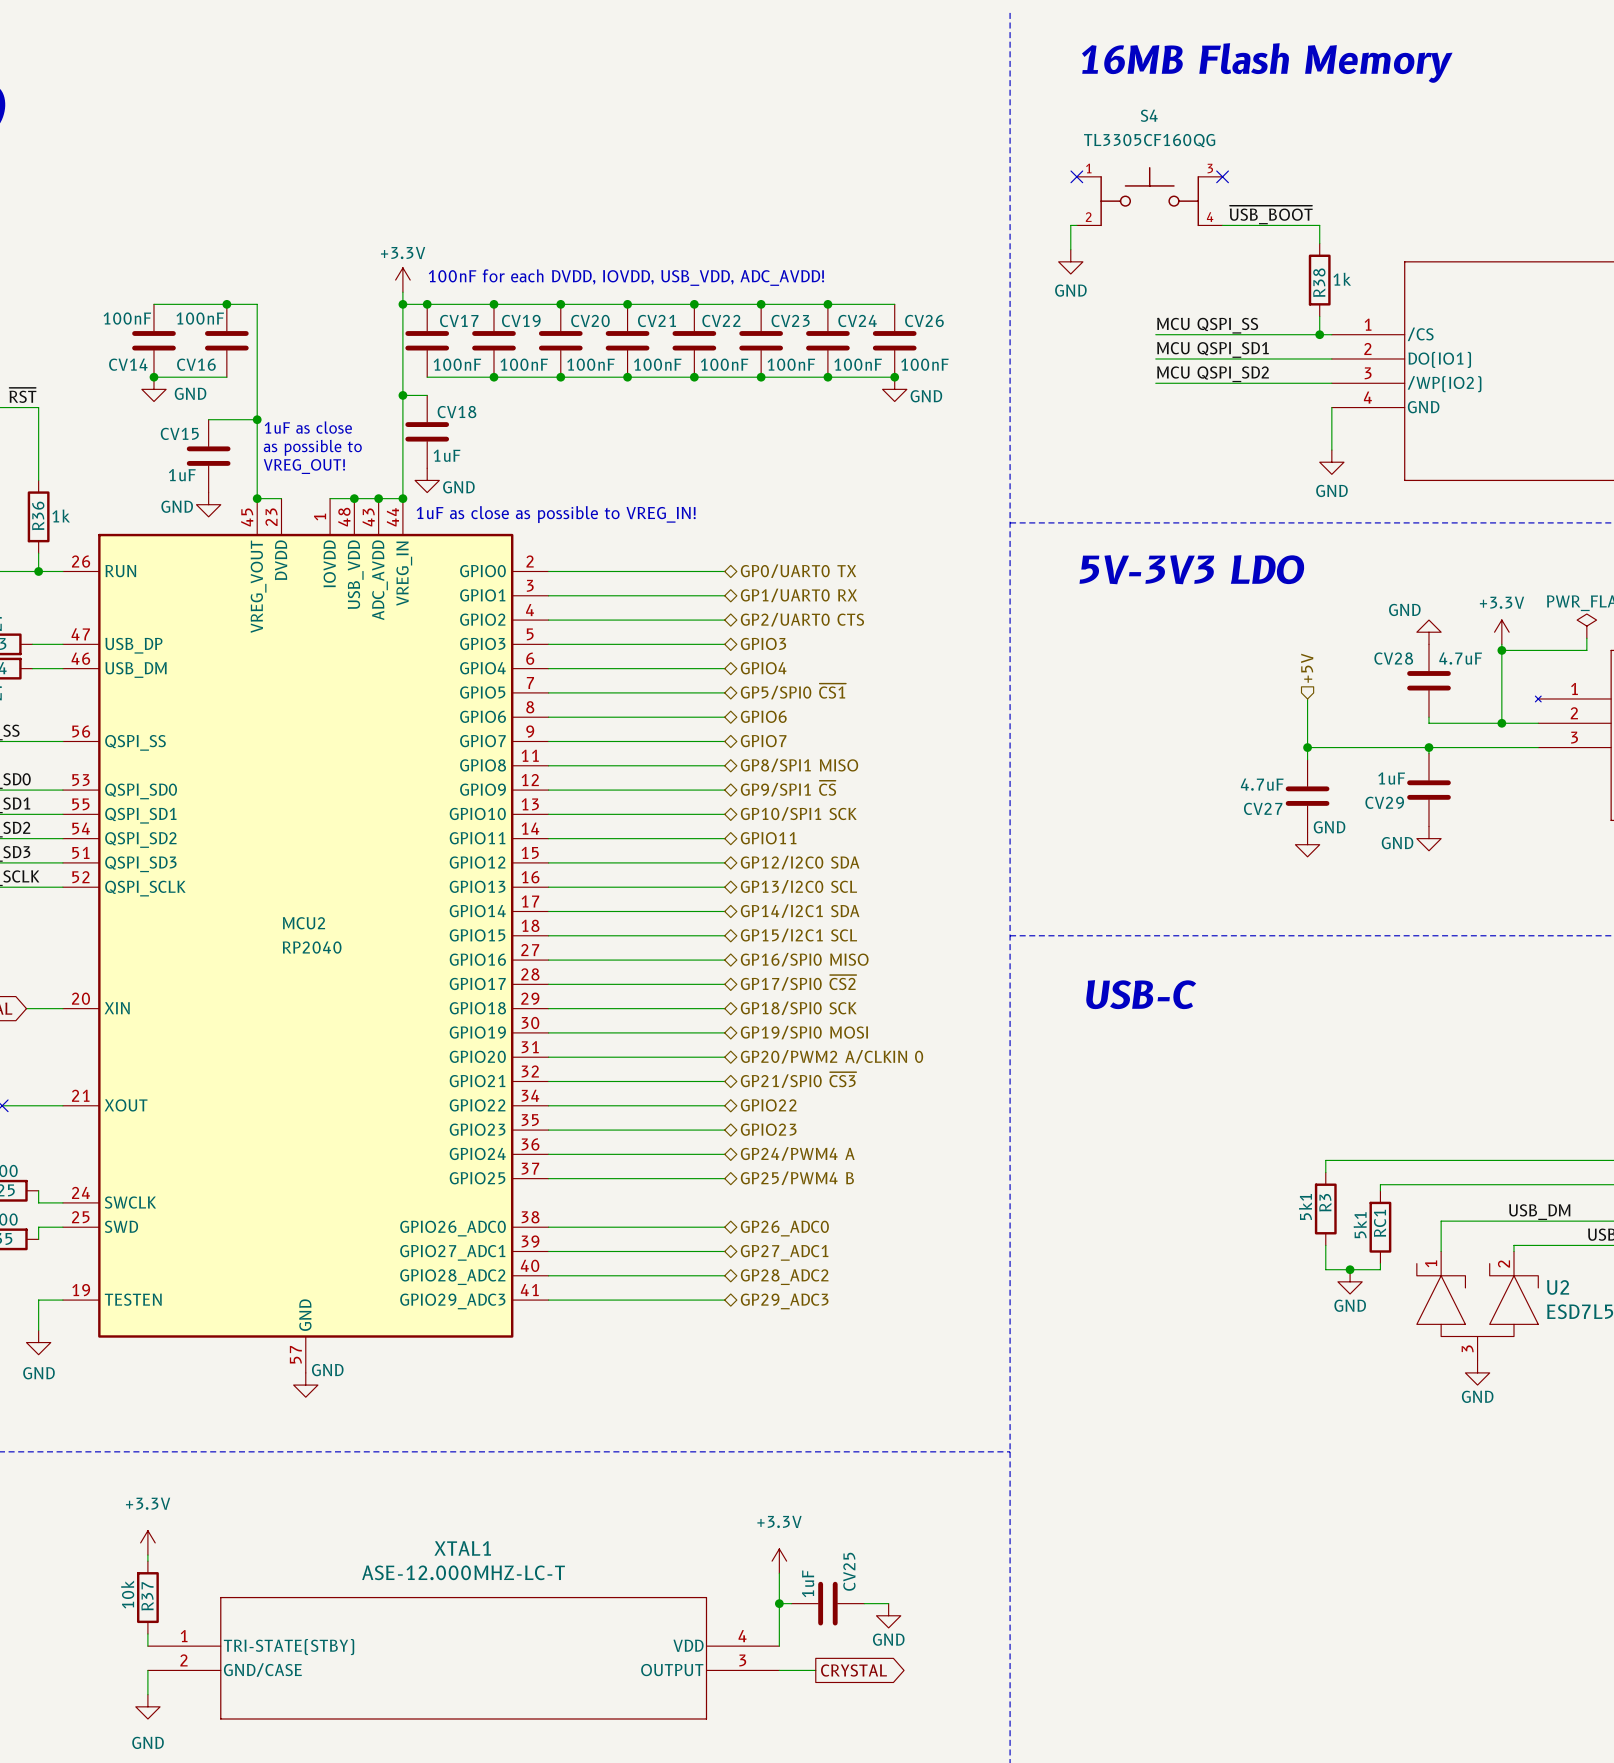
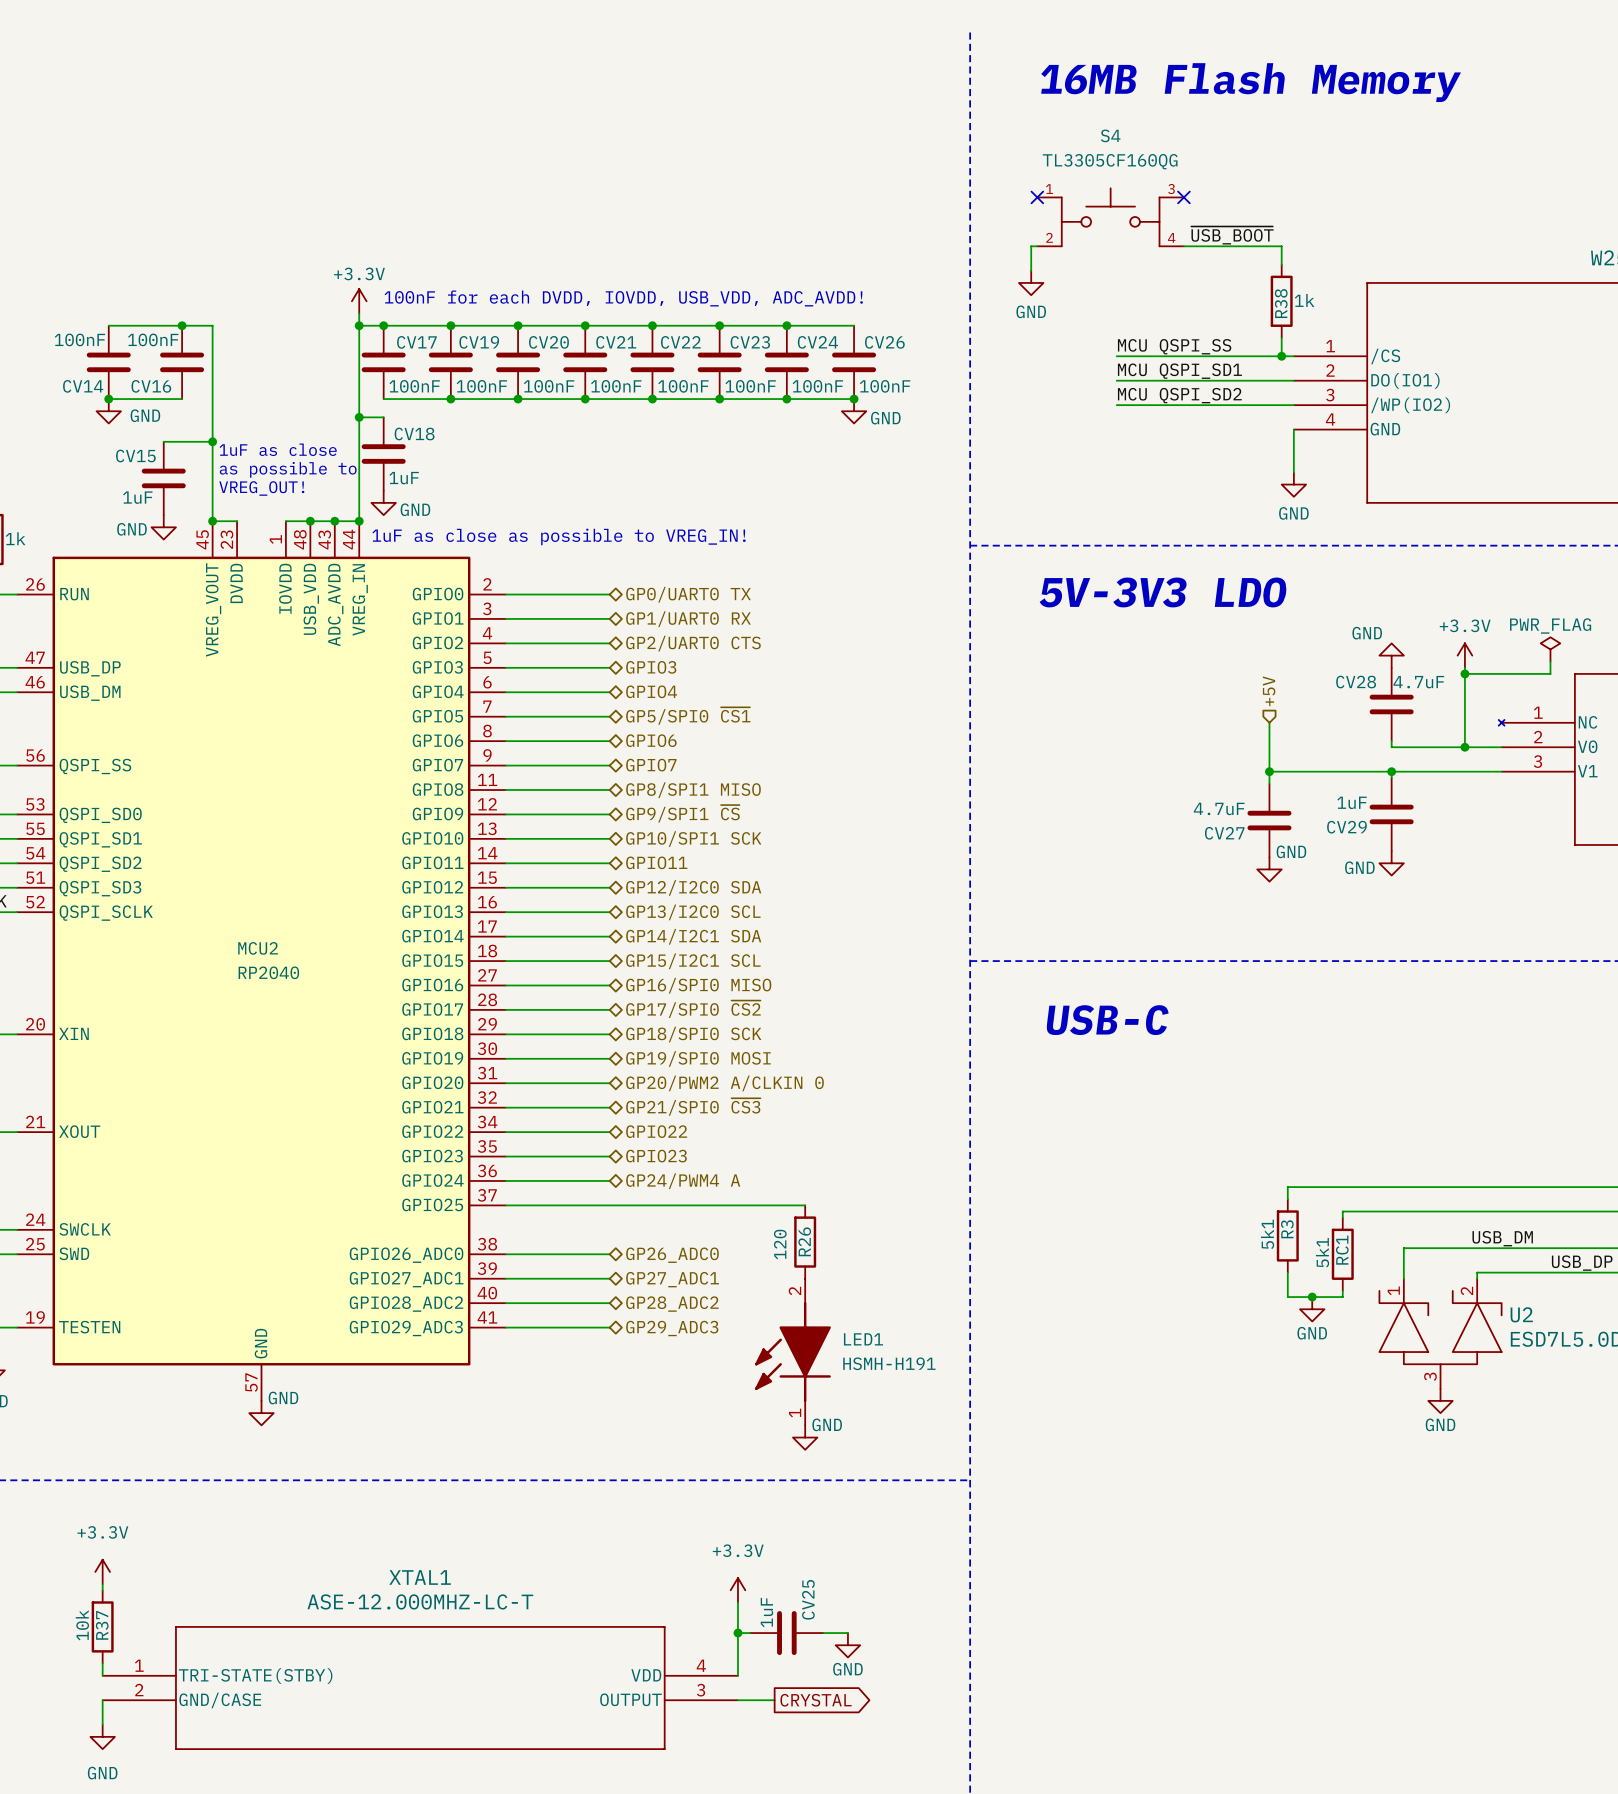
wire: (651, 571) (724, 571) -> none
hierarchical label position: GP0/UART0 TX (798, 571) -> GP0/UART0 TX (688, 594)
wire: (651, 595) (724, 595) -> none
hierarchical label position: GP1/UART0 RX (798, 595) -> GP1/UART0 RX (688, 619)
hierarchical label position: GP2/UART0 CTS (802, 619) -> GP2/UART0 CTS (693, 643)
wire: (651, 620) (724, 620) -> none
hierarchical label position: GPIO3 (763, 643) -> GPIO3 (651, 667)
wire: (651, 644) (724, 644) -> none
wire: (651, 668) (724, 668) -> none
hierarchical label position: GPIO4 (763, 668) -> GPIO4 (651, 691)
hierarchical label position: GP5/SPI0 ~{CS1} (793, 691) -> GP5/SPI0 ~{CS1} (688, 716)
wire: (651, 692) (724, 692) -> none
hierarchical label position: GPIO6 (763, 716) -> GPIO6 (651, 740)
wire: (651, 717) (724, 717) -> none
wire: (651, 741) (724, 741) -> none
hierarchical label position: GPIO7 (763, 741) -> GPIO7 (651, 765)
wire: (651, 765) (724, 765) -> none
hierarchical label position: GP8/SPI1 MISO (799, 765) -> GP8/SPI1 MISO (693, 790)
hierarchical label position: GP9/SPI1 ~{CS} (788, 788) -> GP9/SPI1 ~{CS} (682, 813)
wire: (651, 790) (724, 790) -> none
hierarchical label position: GP10/SPI1 SCK (798, 813) -> GP10/SPI1 SCK (693, 839)
wire: (651, 814) (724, 814) -> none
wire: (651, 838) (724, 838) -> none
hierarchical label position: GPIO11 (768, 838) -> GPIO11 (656, 862)
wire: (651, 862) (724, 862) -> none
hierarchical label position: GP12/I2C0 SDA (800, 862) -> GP12/I2C0 SDA (693, 887)
hierarchical label position: GP13/I2C0 SCL (798, 886) -> GP13/I2C0 SCL (693, 912)
wire: (651, 887) (724, 887) -> none
wire: (651, 911) (724, 911) -> none
hierarchical label position: GP14/I2C1 SDA (800, 911) -> GP14/I2C1 SDA (693, 936)
wire: (651, 935) (724, 935) -> none
hierarchical label position: GP15/I2C1 SCL (798, 935) -> GP15/I2C1 SCL (693, 961)
hierarchical label position: GP16/SPI0 MISO (804, 959) -> GP16/SPI0 MISO (698, 985)
wire: (651, 960) (724, 960) -> none
hierarchical label position: GP17/SPI0 ~{CS2} (798, 982) -> GP17/SPI0 ~{CS2} (693, 1009)
wire: (651, 984) (724, 984) -> none
wire: (651, 1008) (724, 1008) -> none
hierarchical label position: GP18/SPI0 SCK (798, 1008) -> GP18/SPI0 SCK (693, 1034)
wire: (651, 1032) (724, 1032) -> none
hierarchical label position: GP19/SPI0 MOSI (804, 1032) -> GP19/SPI0 MOSI (698, 1059)
hierarchical label position: GP20/PWM2 A/CLKIN 0 (831, 1056) -> GP20/PWM2 A/CLKIN 0 (724, 1083)
wire: (651, 1057) (724, 1057) -> none
hierarchical label position: GP21/SPI0 ~{CS3} (798, 1080) -> GP21/SPI0 ~{CS3} (693, 1107)
wire: (651, 1081) (724, 1081) -> none
wire: (651, 1105) (724, 1105) -> none
hierarchical label position: GPIO22 (768, 1105) -> GPIO22 (656, 1131)
hierarchical label position: GPIO23 (768, 1129) -> GPIO23 (656, 1156)
wire: (651, 1130) (724, 1130) -> none
hierarchical label position: GP24/PWM4 A (797, 1153) -> GP24/PWM4 A (683, 1181)
wire: (651, 1154) (724, 1154) -> none
wire: none -> (683, 1205) (805, 1205)
hierarchical label: GP25/PWM4 B (797, 1178) -> none
R26: none -> 120 (805, 1242)
wire: (651, 1227) (724, 1227) -> none
hierarchical label position: GP26_ADC0 (784, 1228) -> GP26_ADC0 (672, 1255)
wire: (651, 1251) (724, 1251) -> none
hierarchical label position: GP27_ADC1 (784, 1252) -> GP27_ADC1 (672, 1279)
wire: (651, 1275) (724, 1275) -> none
hierarchical label position: GP28_ADC2 (784, 1277) -> GP28_ADC2 (672, 1304)
wire: (651, 1300) (724, 1300) -> none
hierarchical label position: GP29_ADC3 (784, 1301) -> GP29_ADC3 (672, 1328)
LED1: none -> HSMH-H191 (792, 1352)
power symbol: none -> GND (805, 1437)

